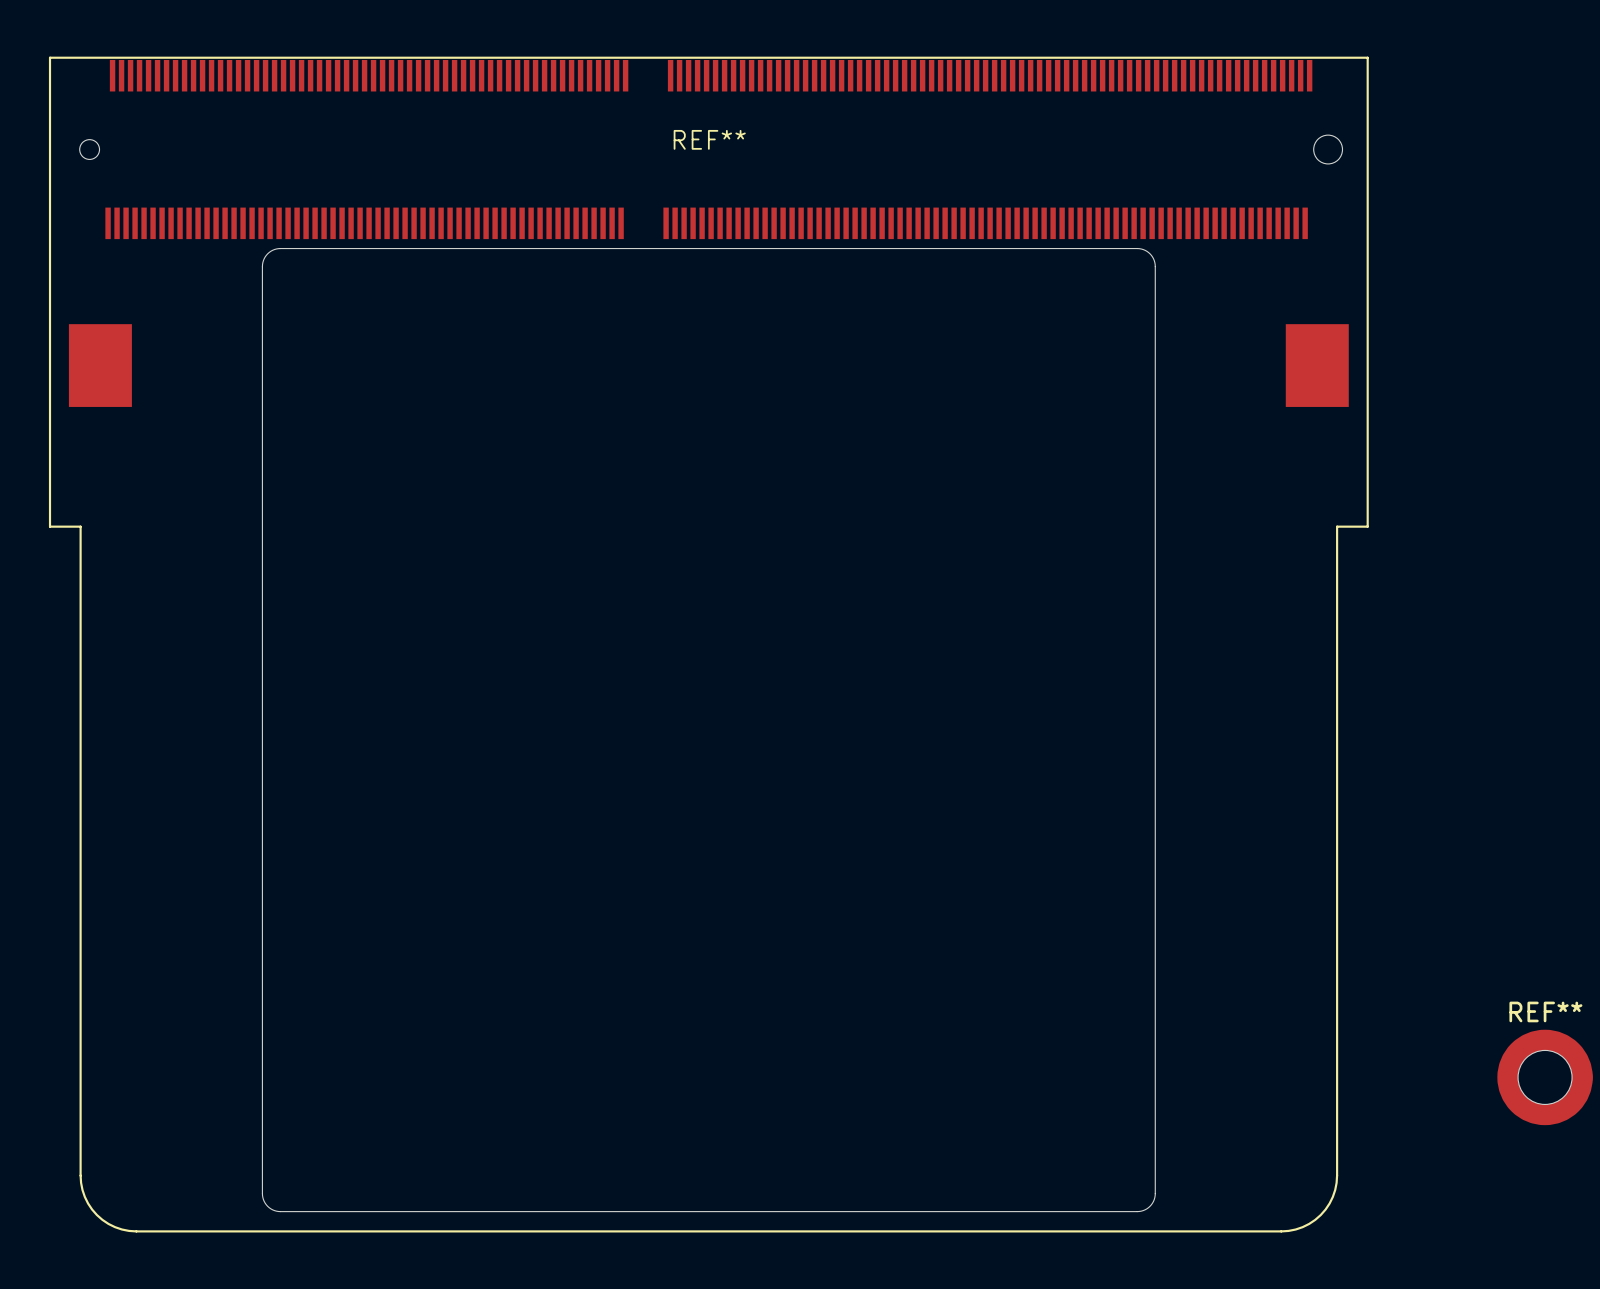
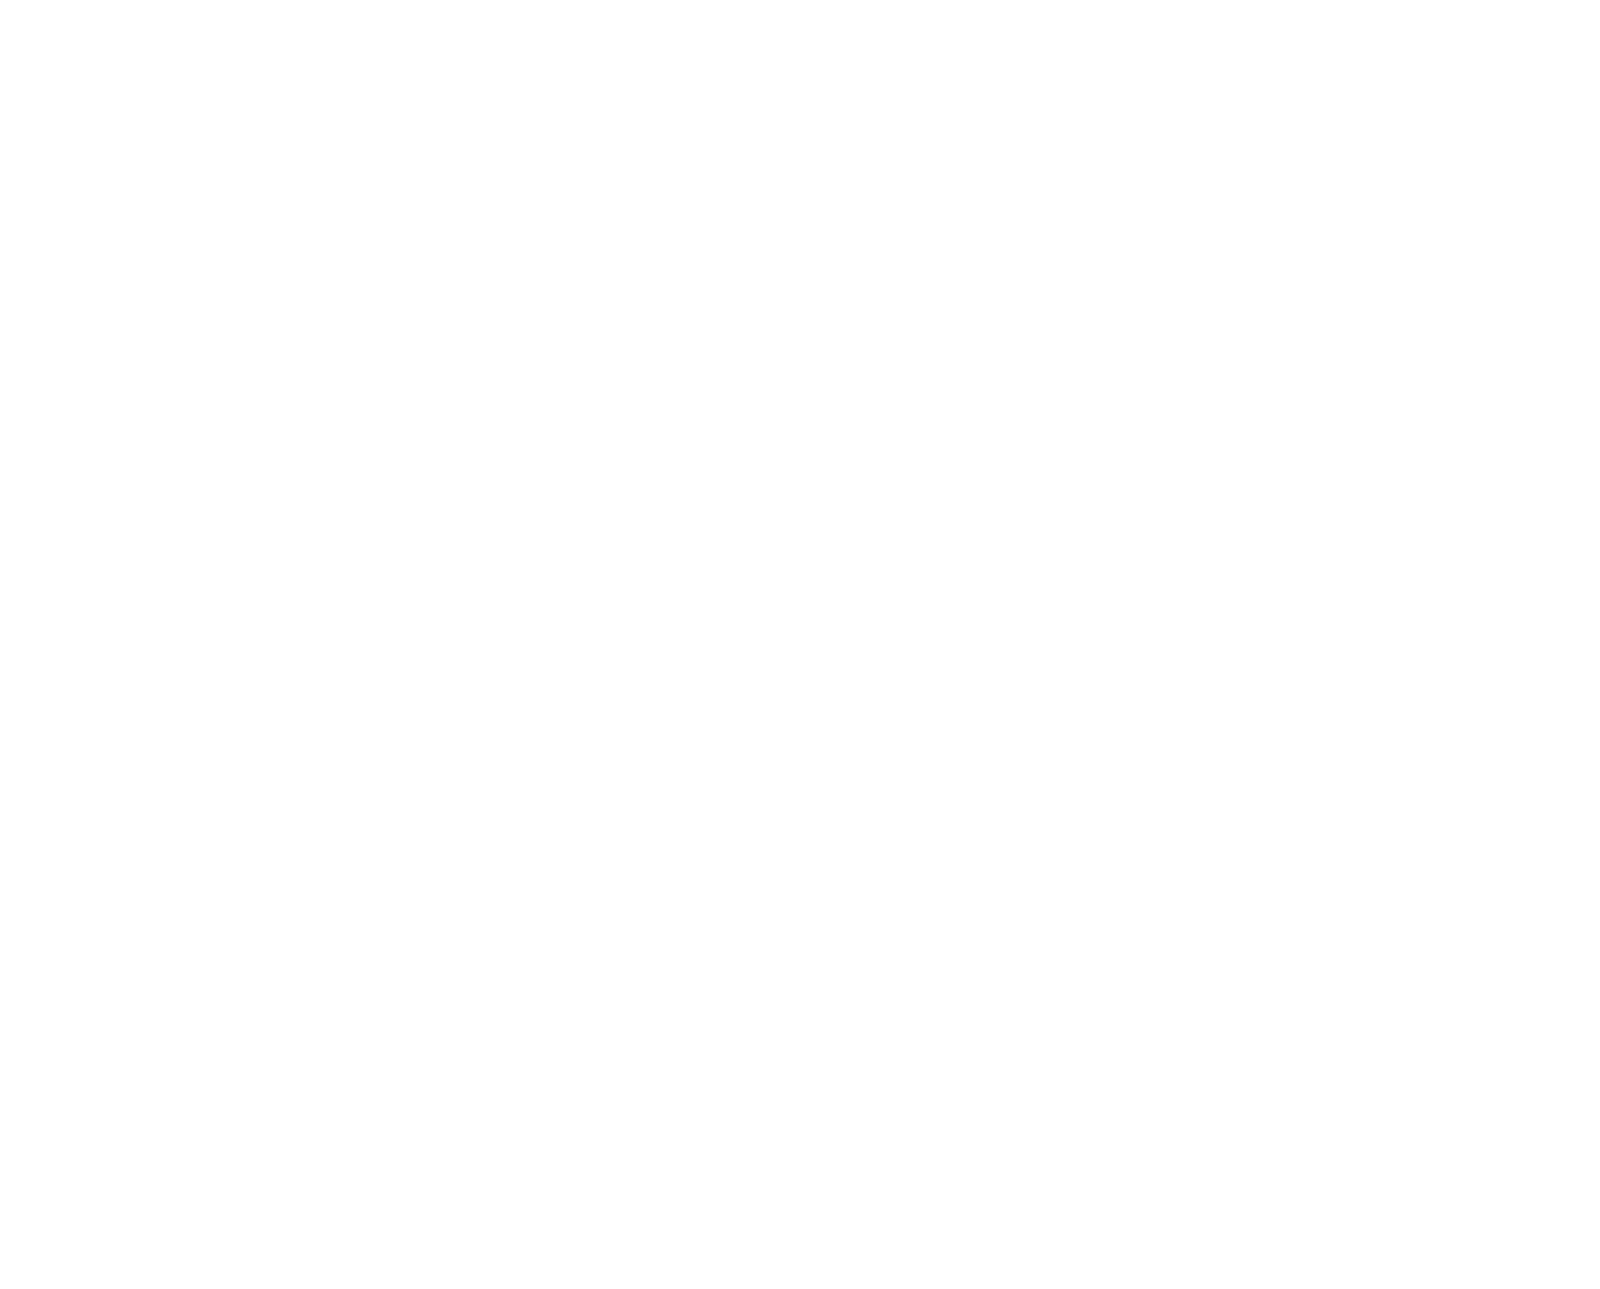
REF**: (708, 644) -> none
REF**: (1545, 1077) -> none

